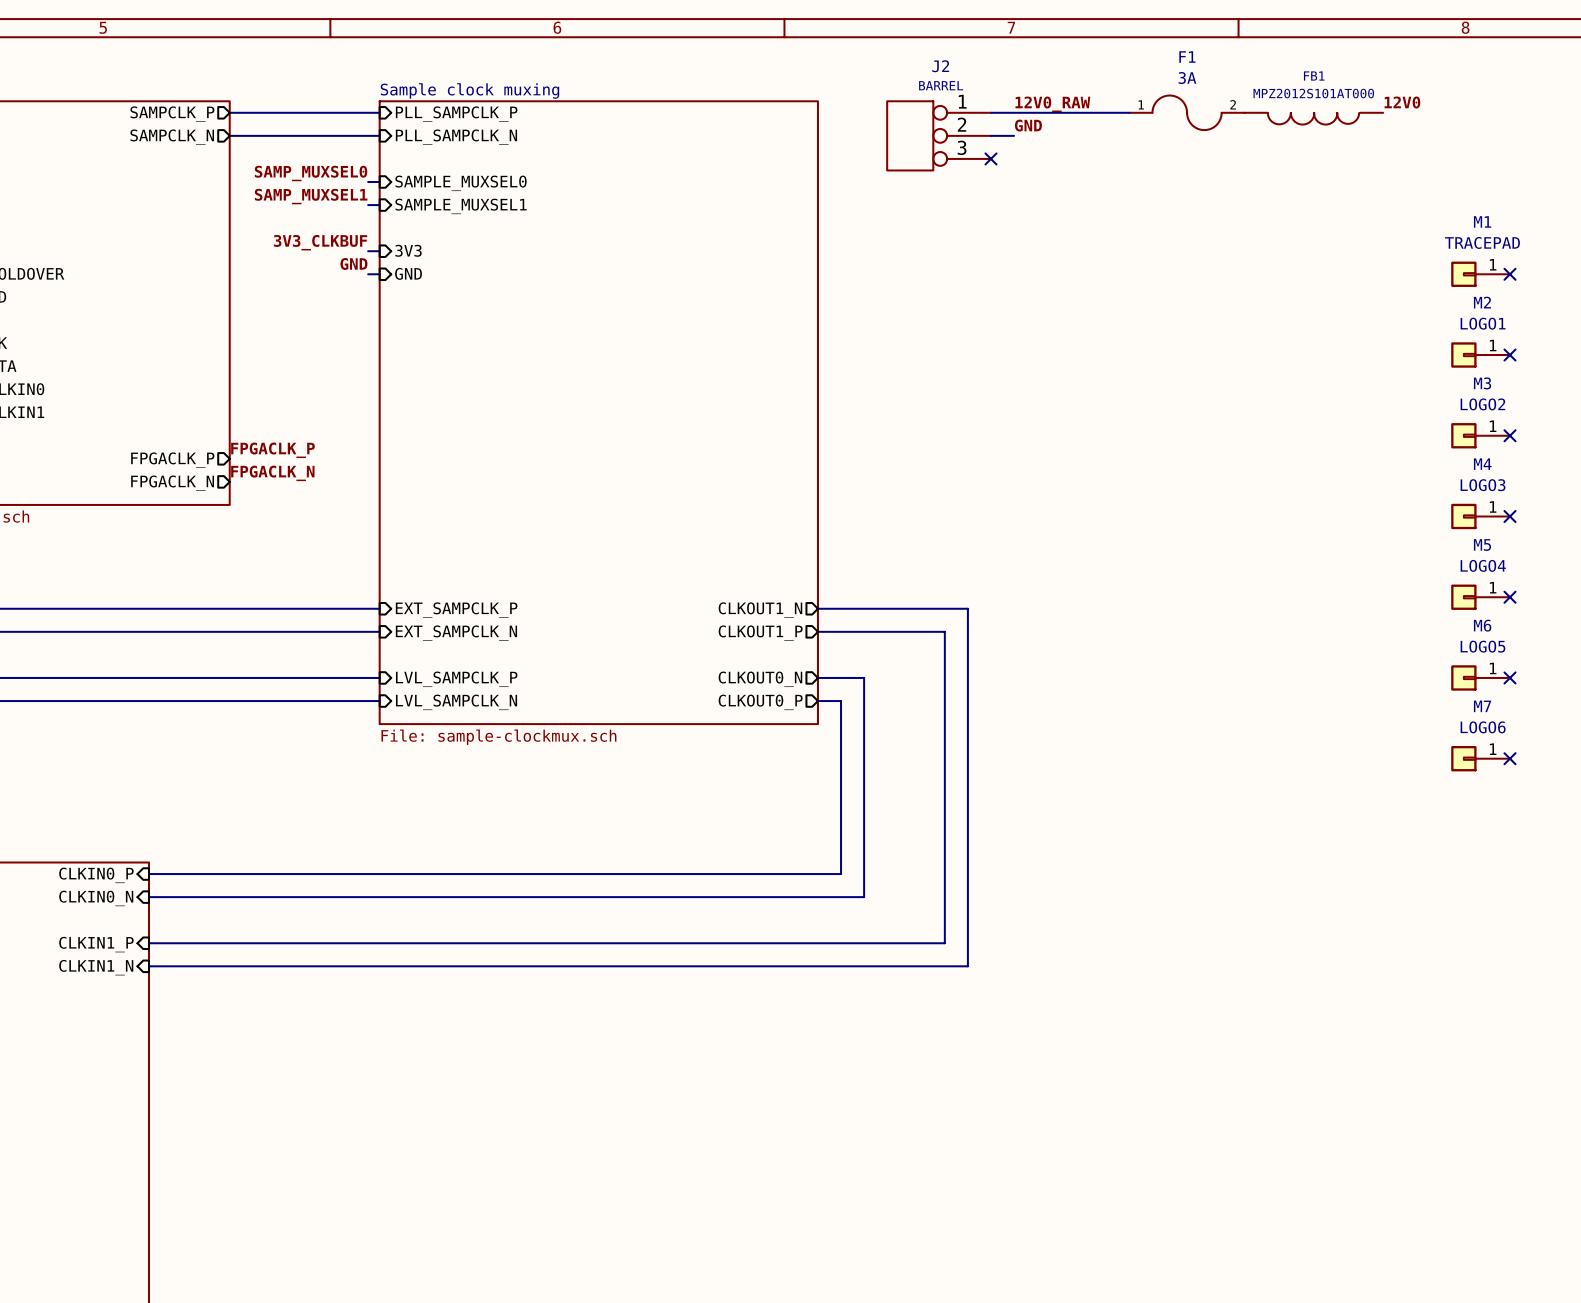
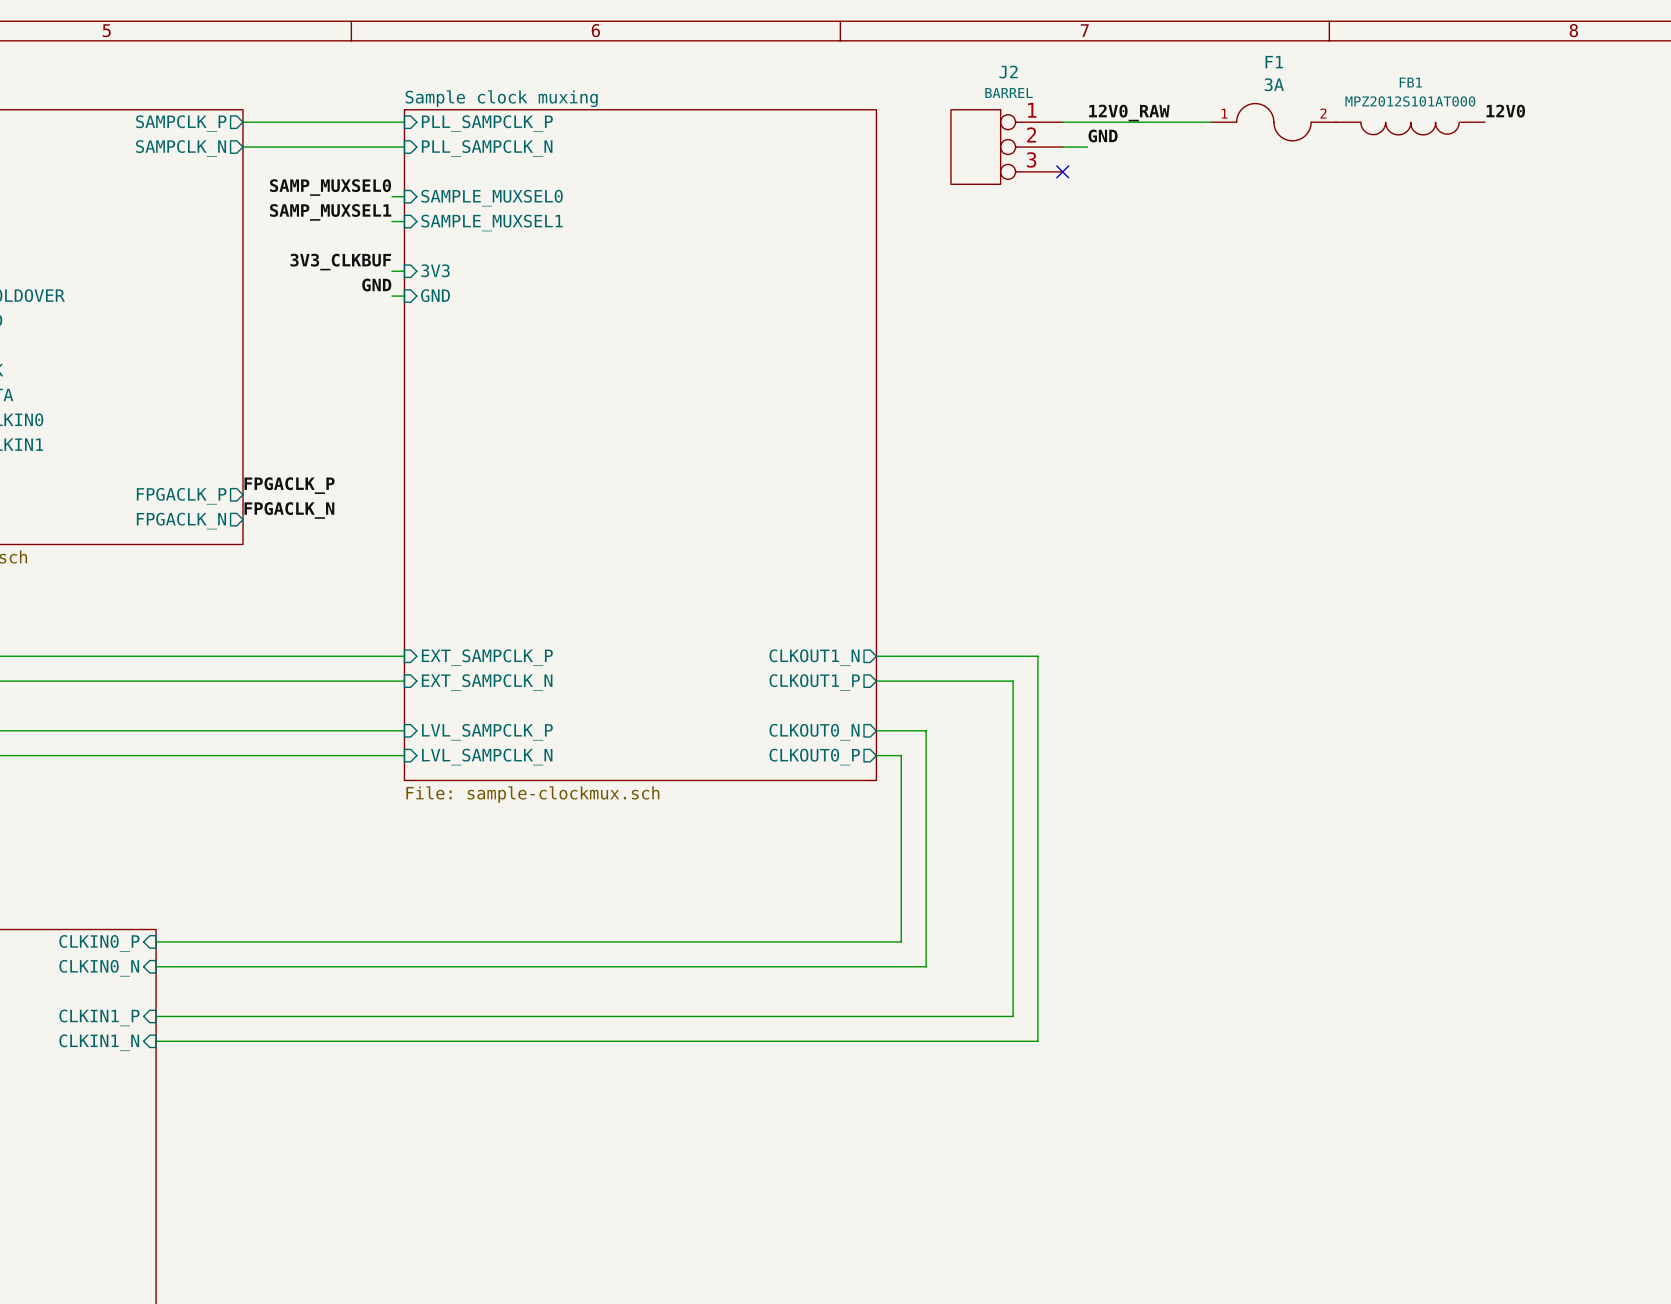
M1: TRACEPAD (1480, 274) -> none
no-connect mark: (1510, 274) -> none
M2: LOGO1 (1480, 355) -> none
no-connect mark: (1510, 355) -> none
M3: LOGO2 (1480, 435) -> none
no-connect mark: (1510, 435) -> none
M4: LOGO3 (1480, 516) -> none
no-connect mark: (1510, 516) -> none
M5: LOGO4 (1480, 597) -> none
no-connect mark: (1510, 597) -> none
M6: LOGO5 (1480, 677) -> none
no-connect mark: (1510, 677) -> none
M7: LOGO6 (1480, 758) -> none
no-connect mark: (1510, 758) -> none

